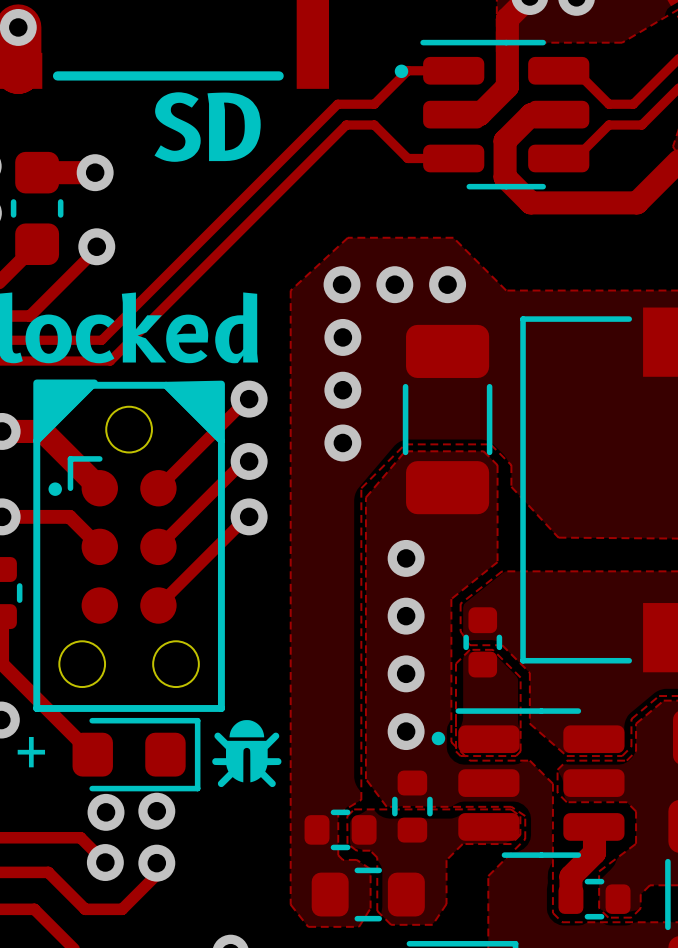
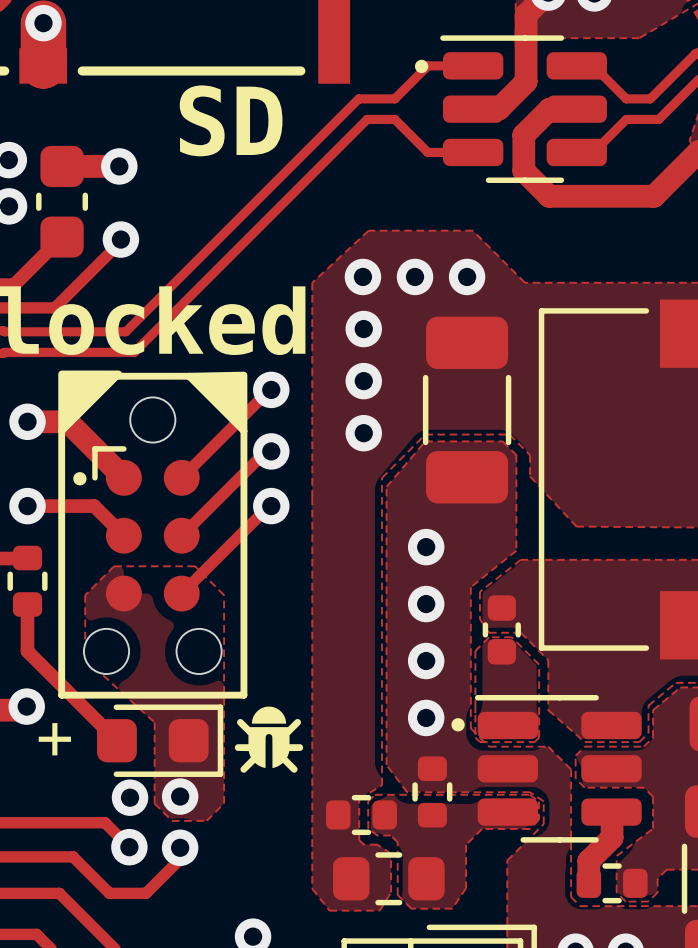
zone outline: none -> (114, 566) (195, 566) (224, 595) (224, 803) (206, 820) (171, 820) (154, 803) (154, 722) (85, 658) (85, 595) (114, 566)

